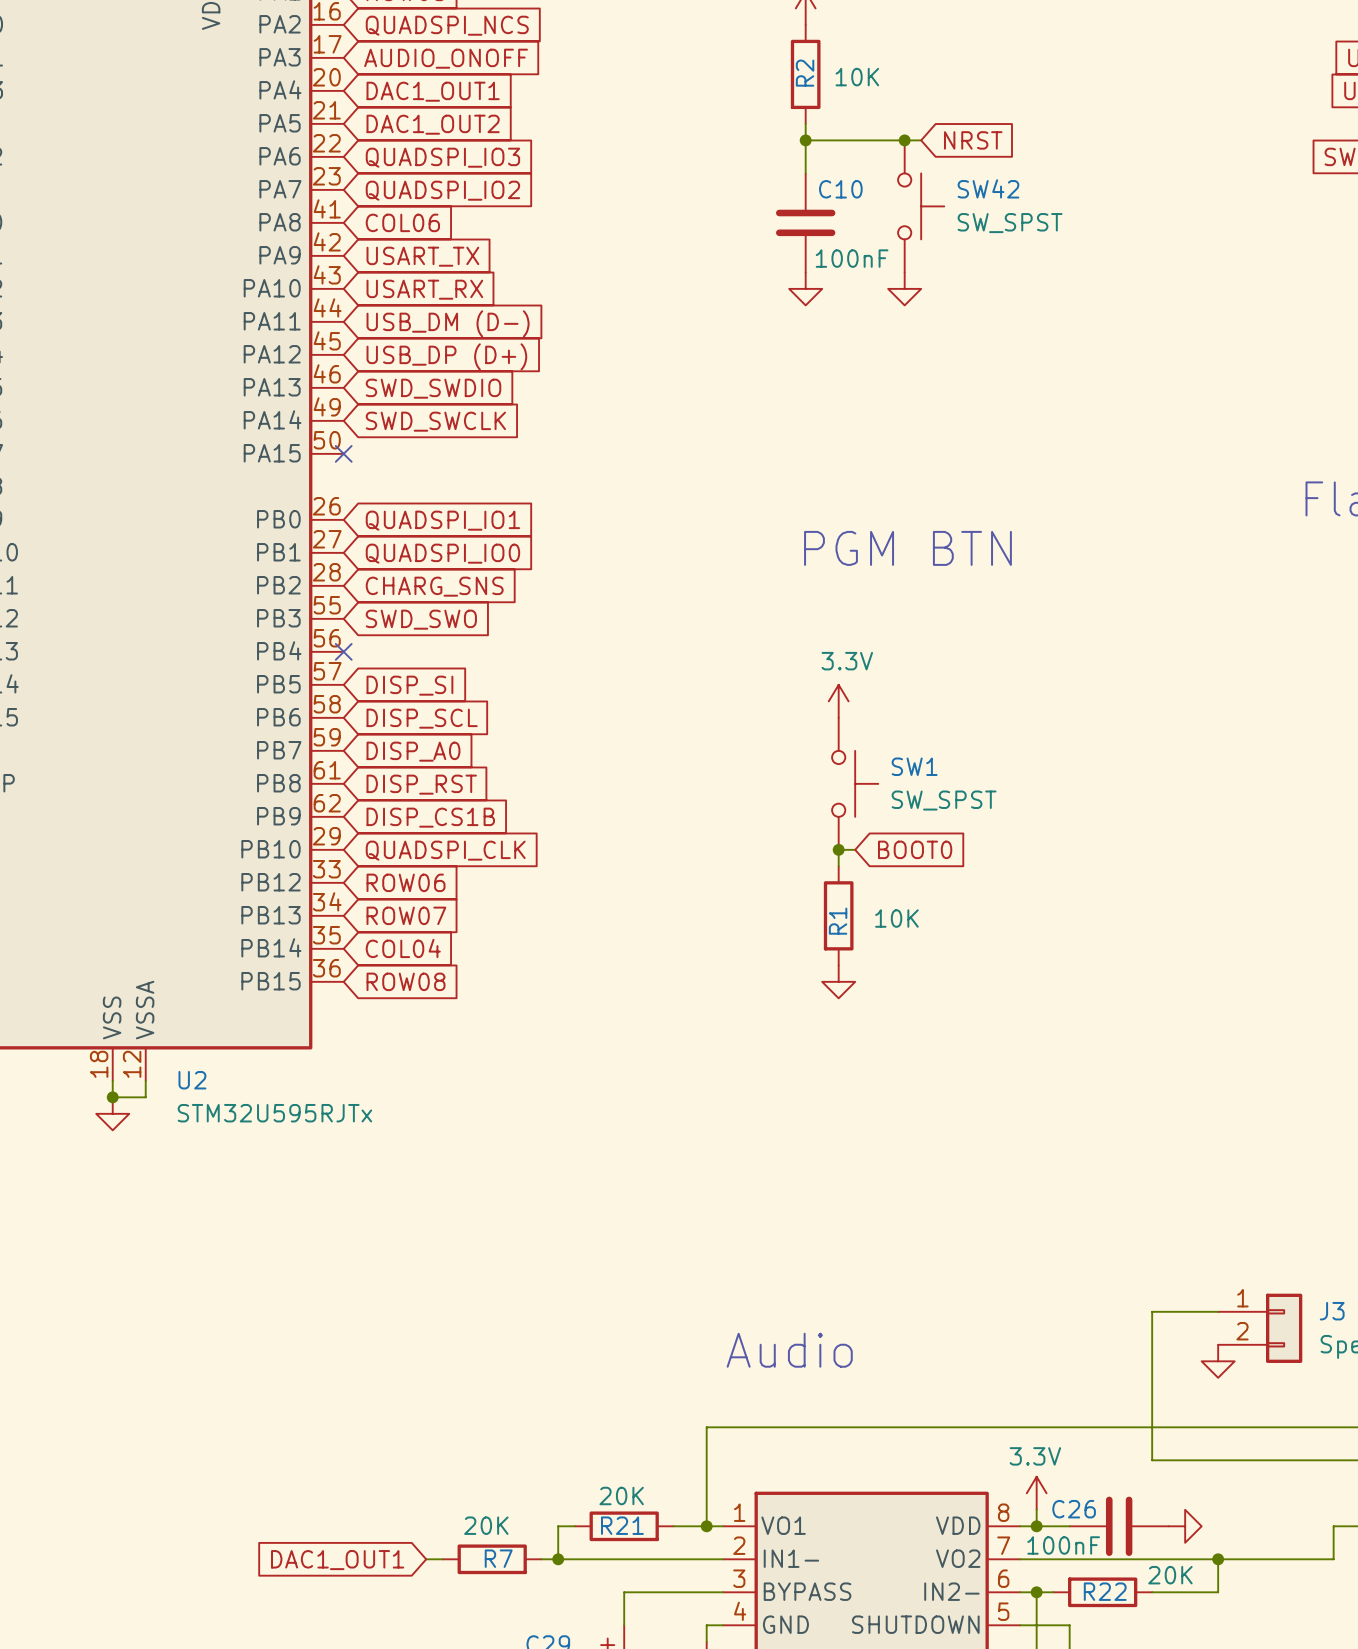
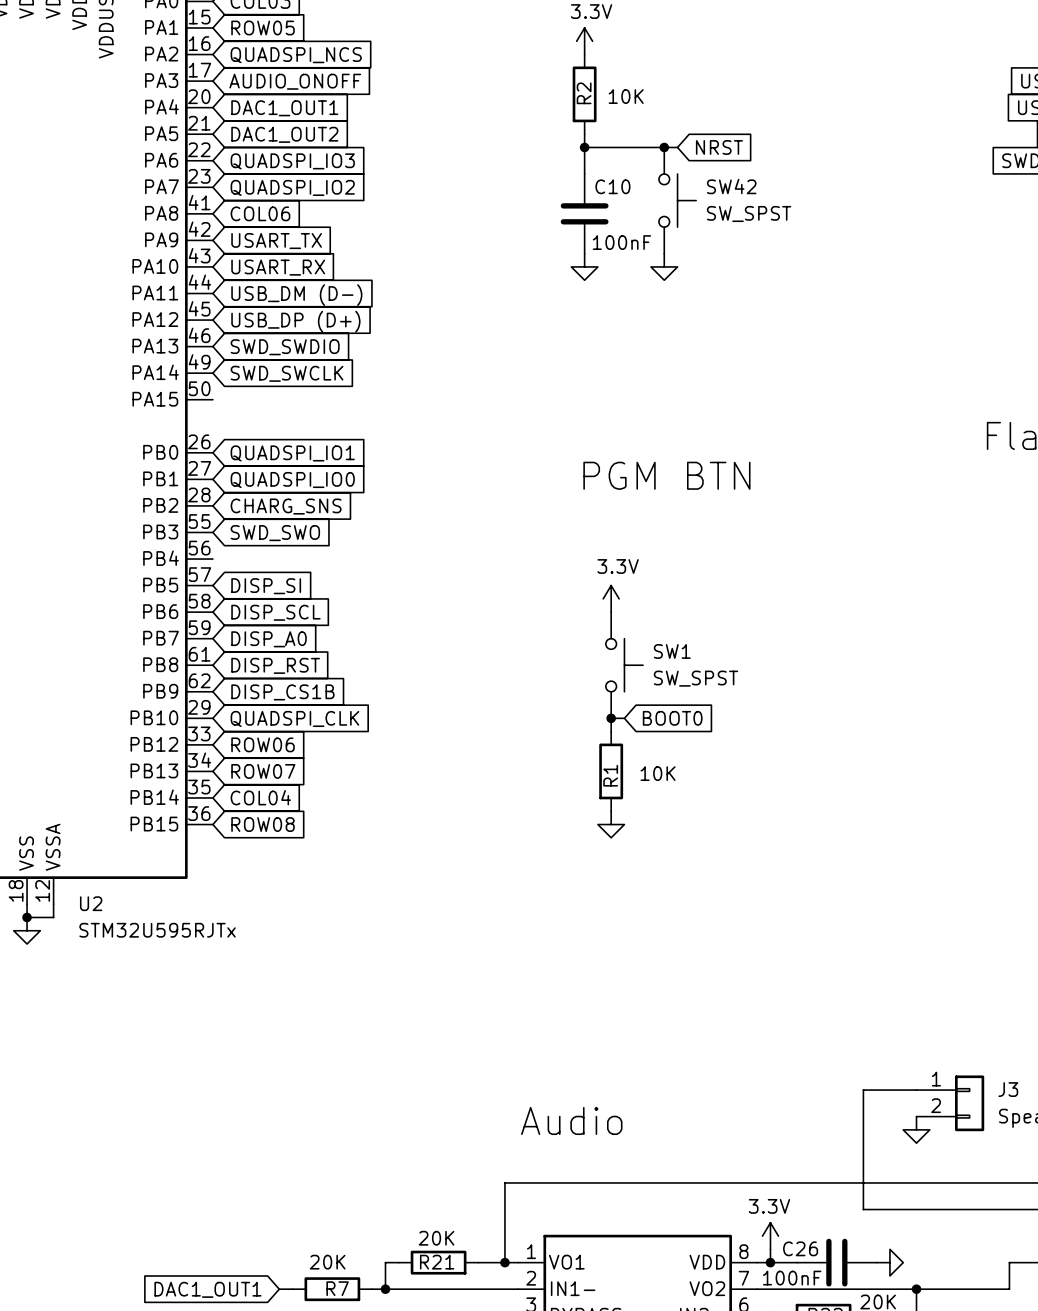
no-connect mark: (343, 453) -> none
no-connect mark: (343, 651) -> none

